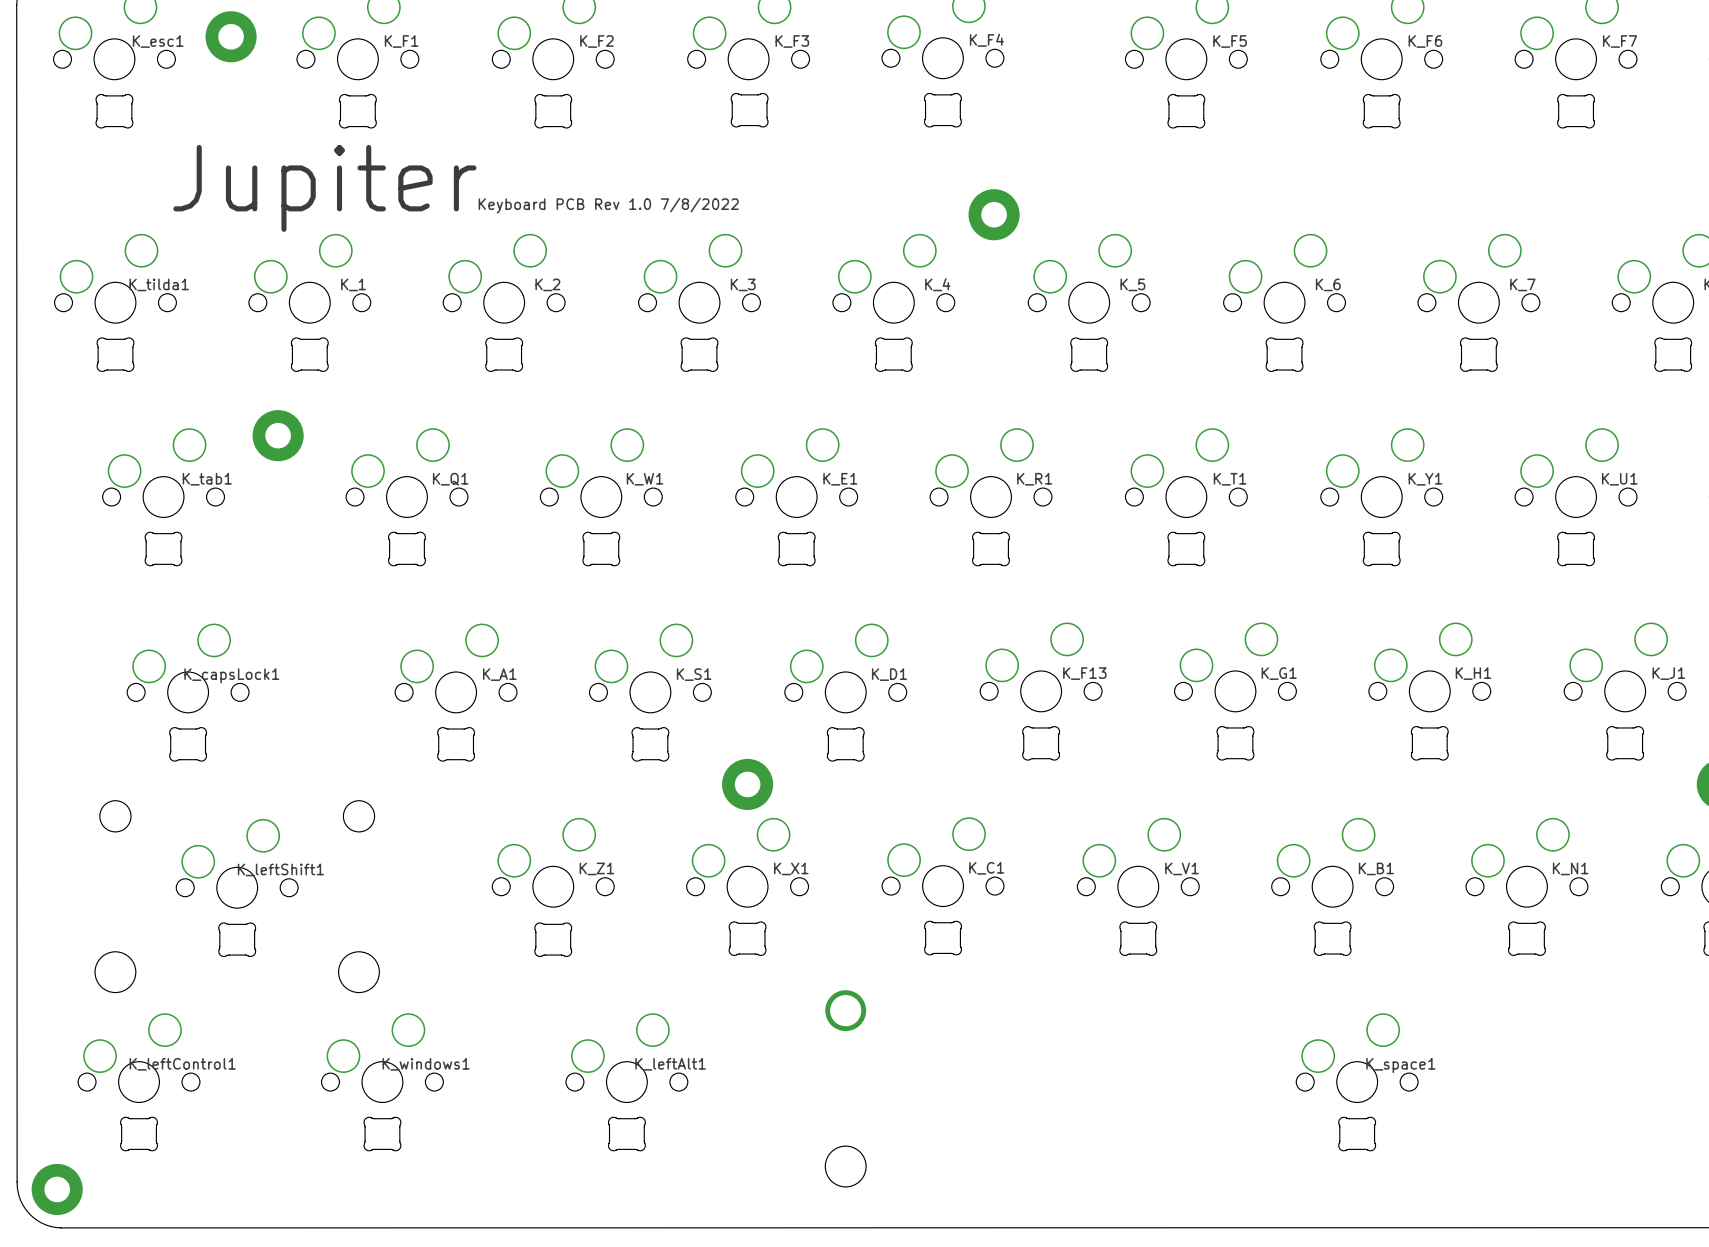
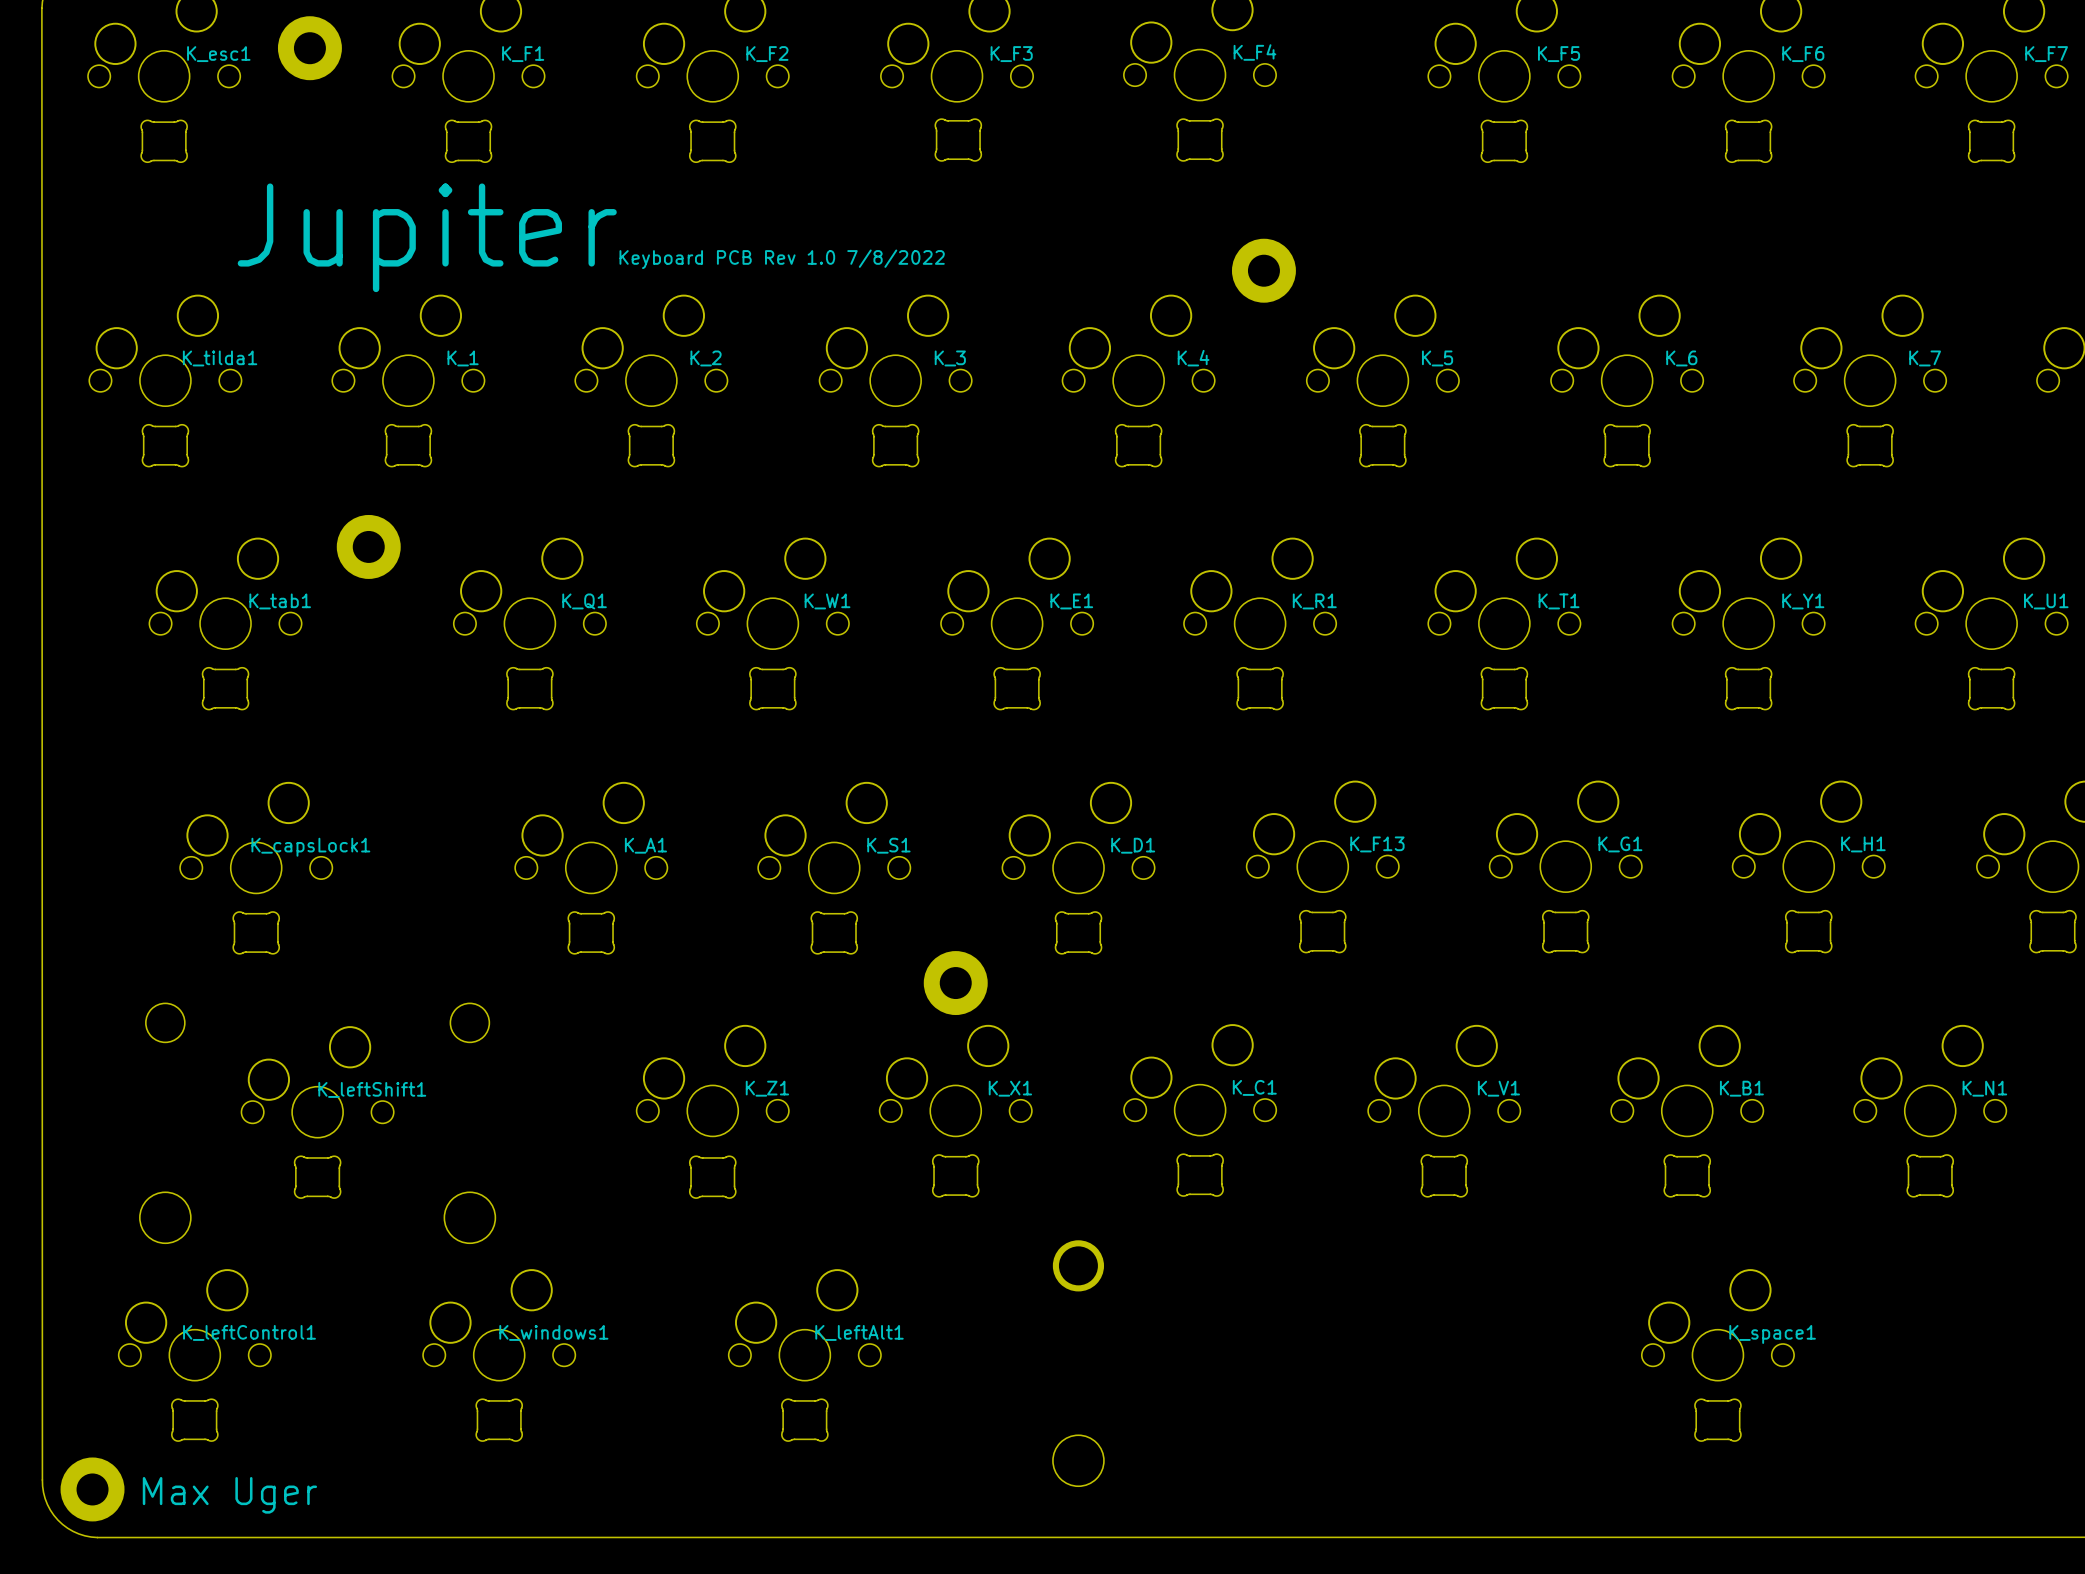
text: none -> Max Uger (229, 1495)

